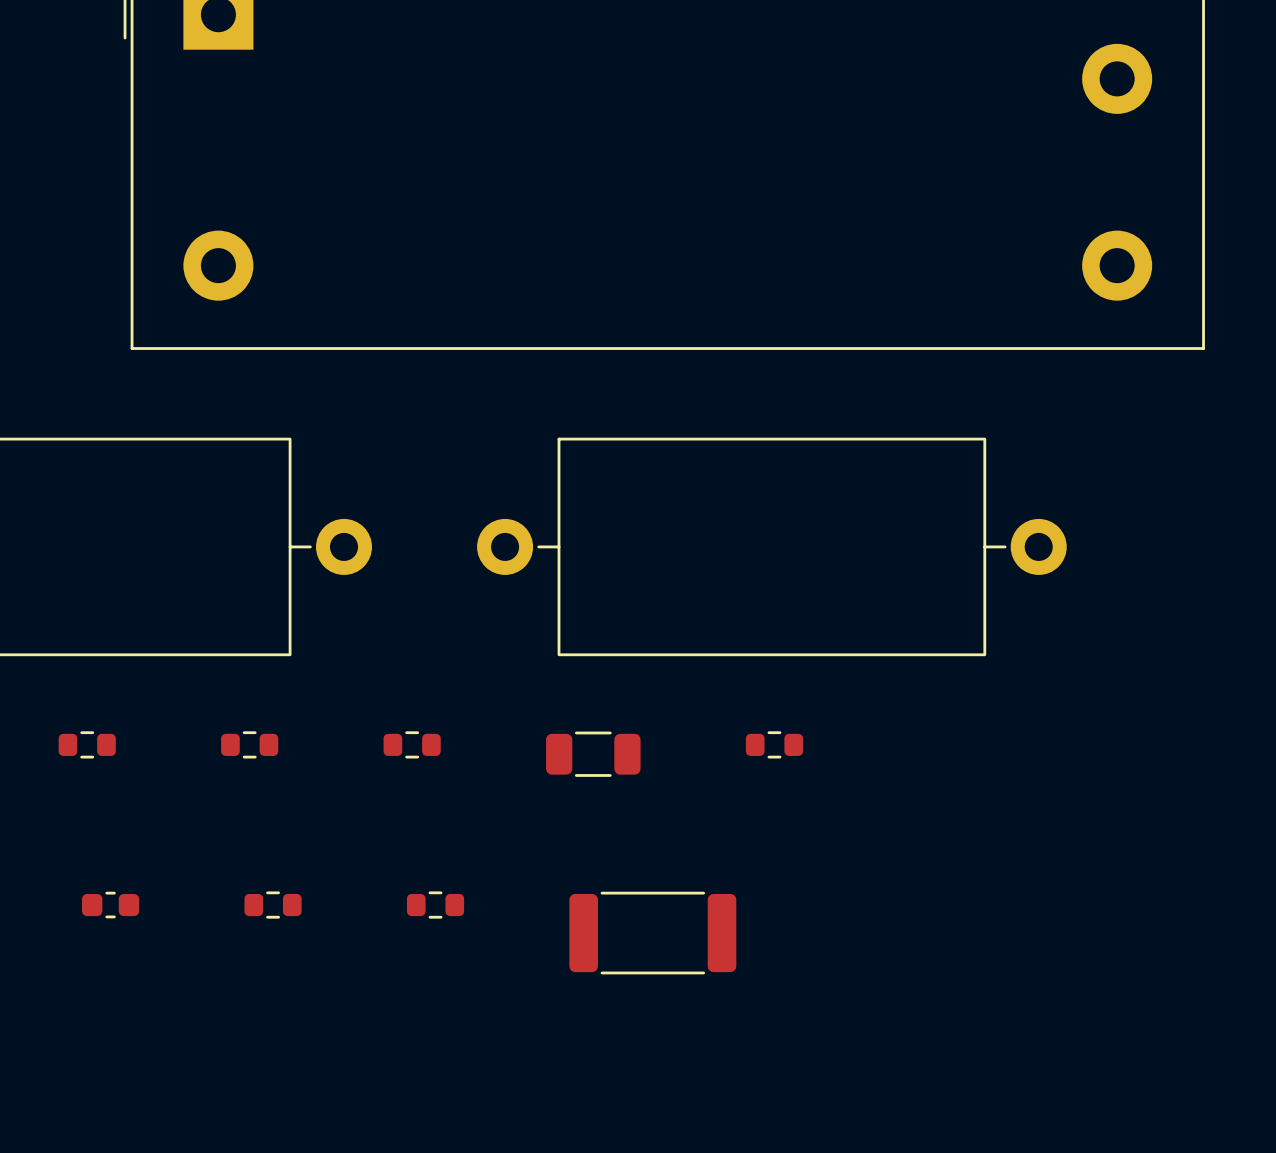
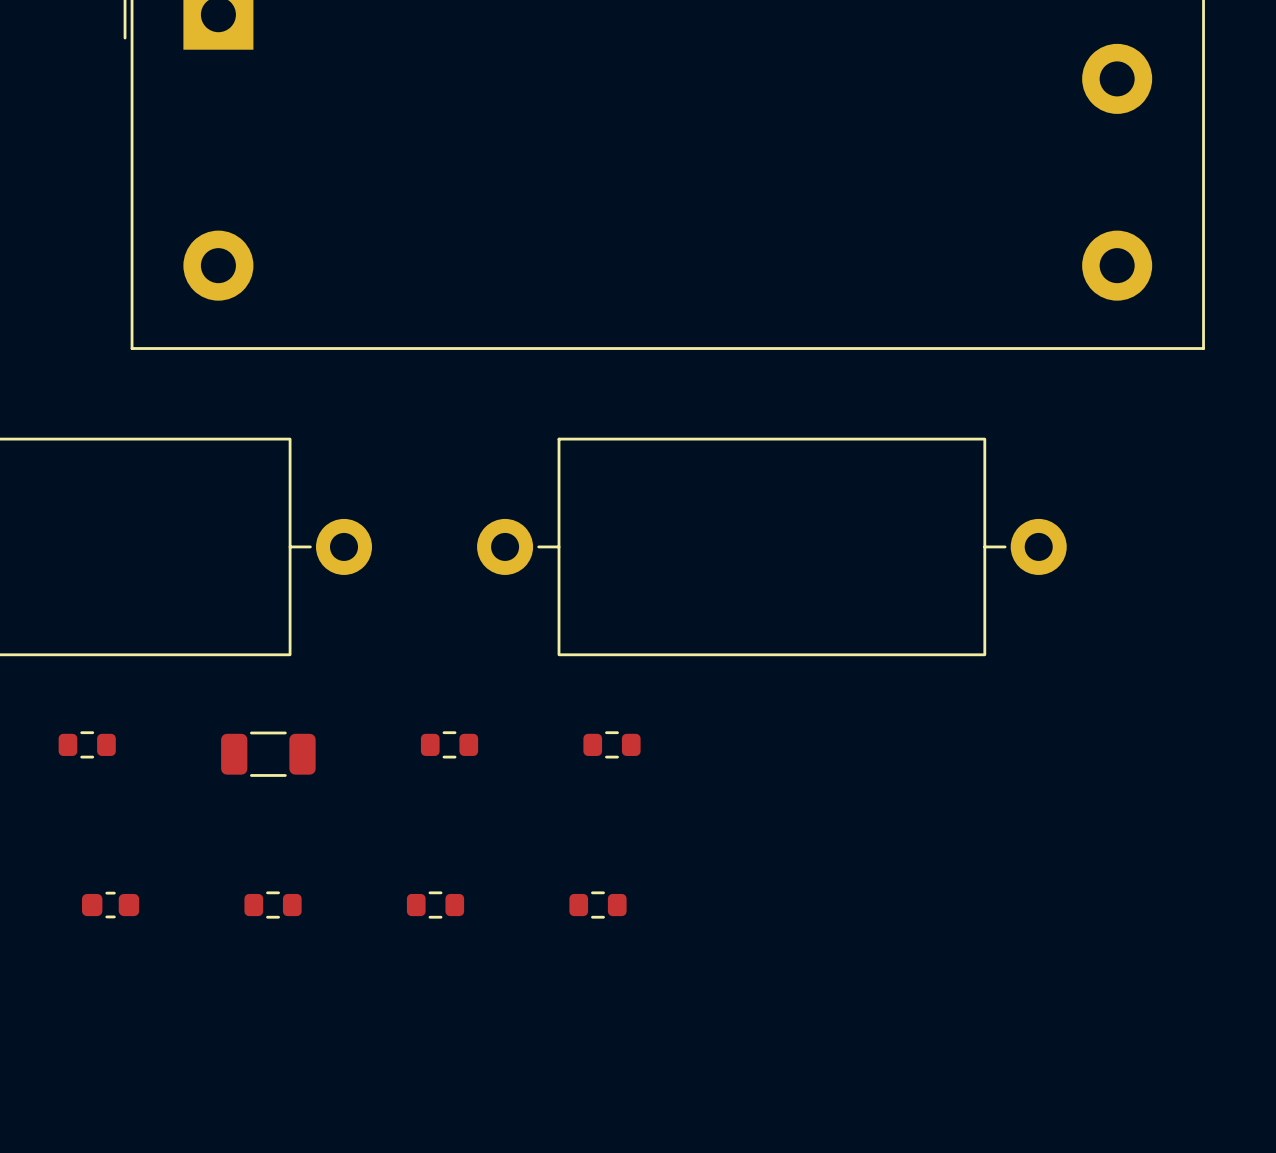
part footprint: [221, 731, 279, 759] -> [221, 731, 316, 777]
part footprint: [546, 731, 641, 777] -> [583, 731, 641, 759]
part position: (412, 744) -> (449, 744)
part: (774, 744) -> none
part: none -> (597, 905)
part: (652, 933) -> none

